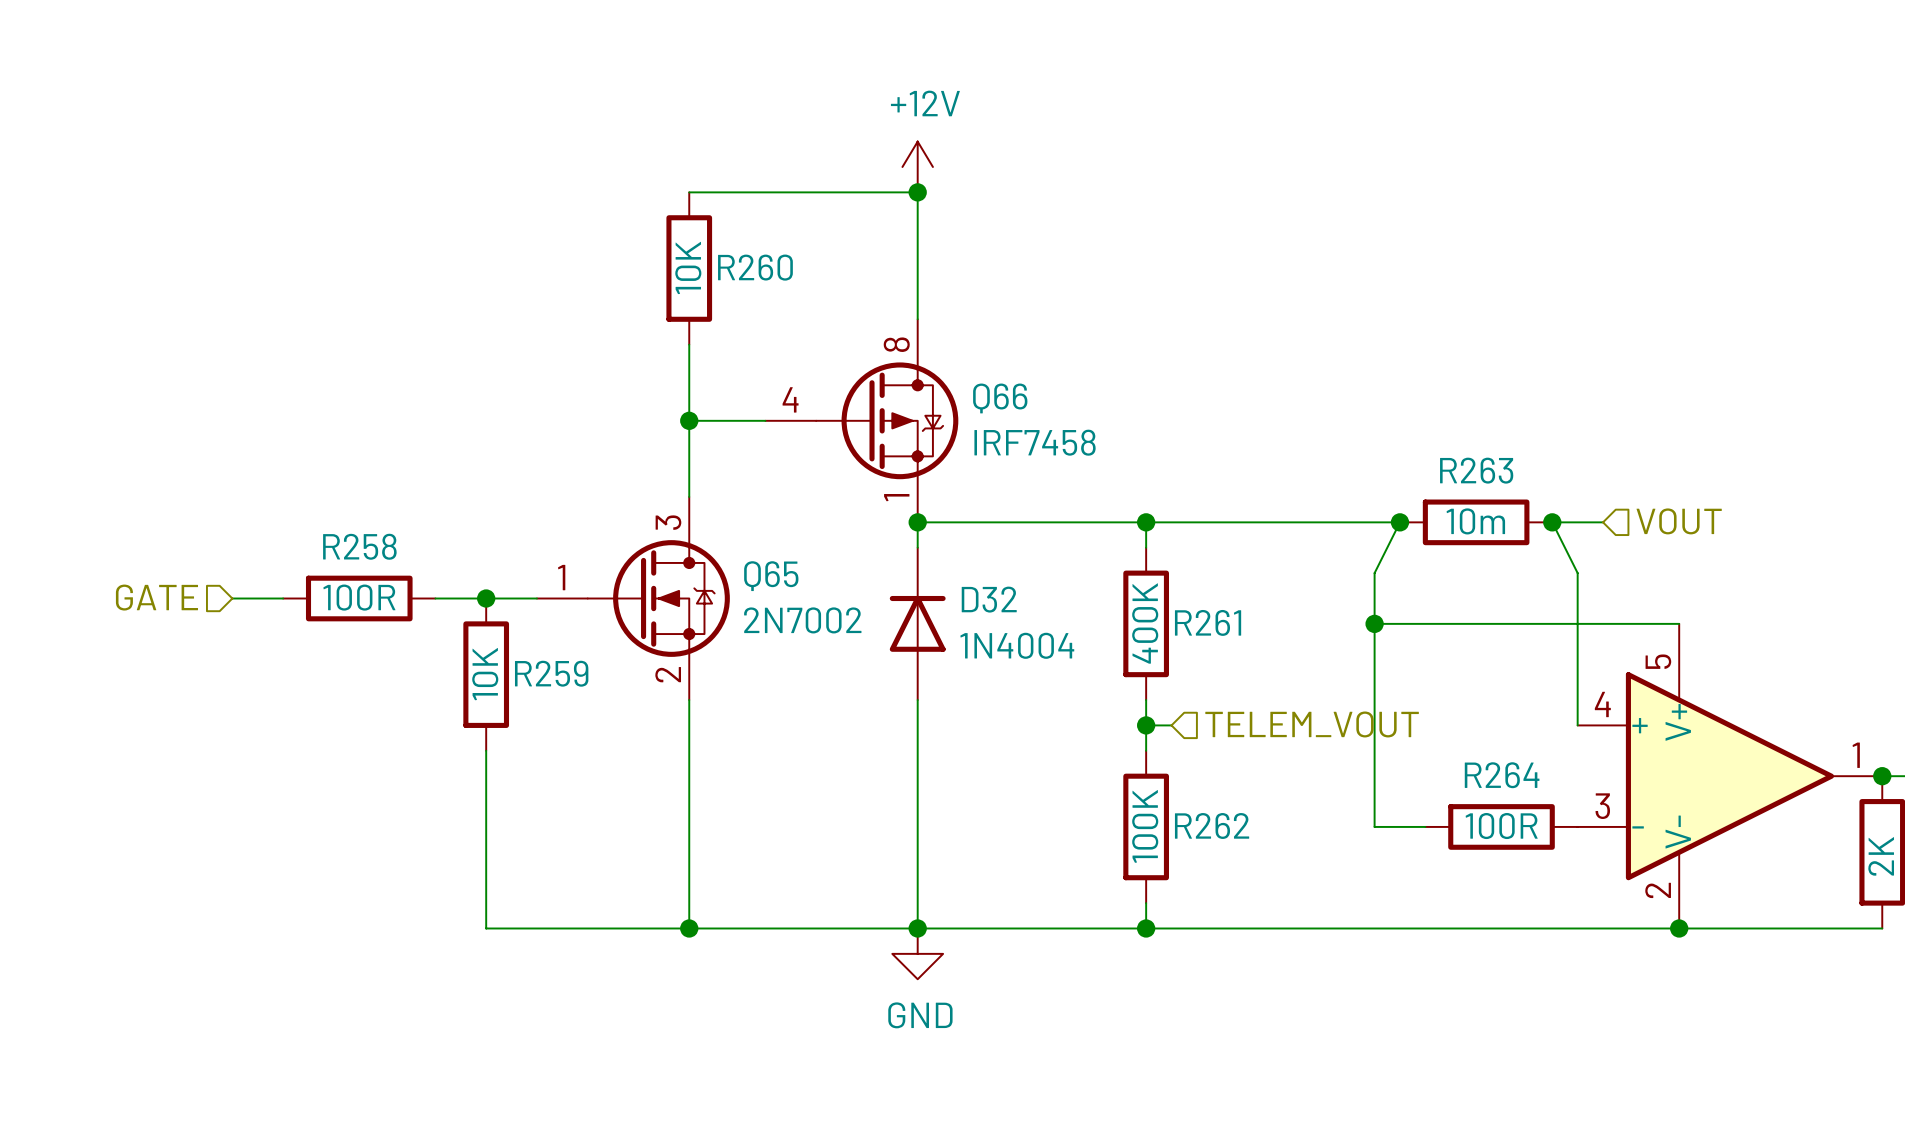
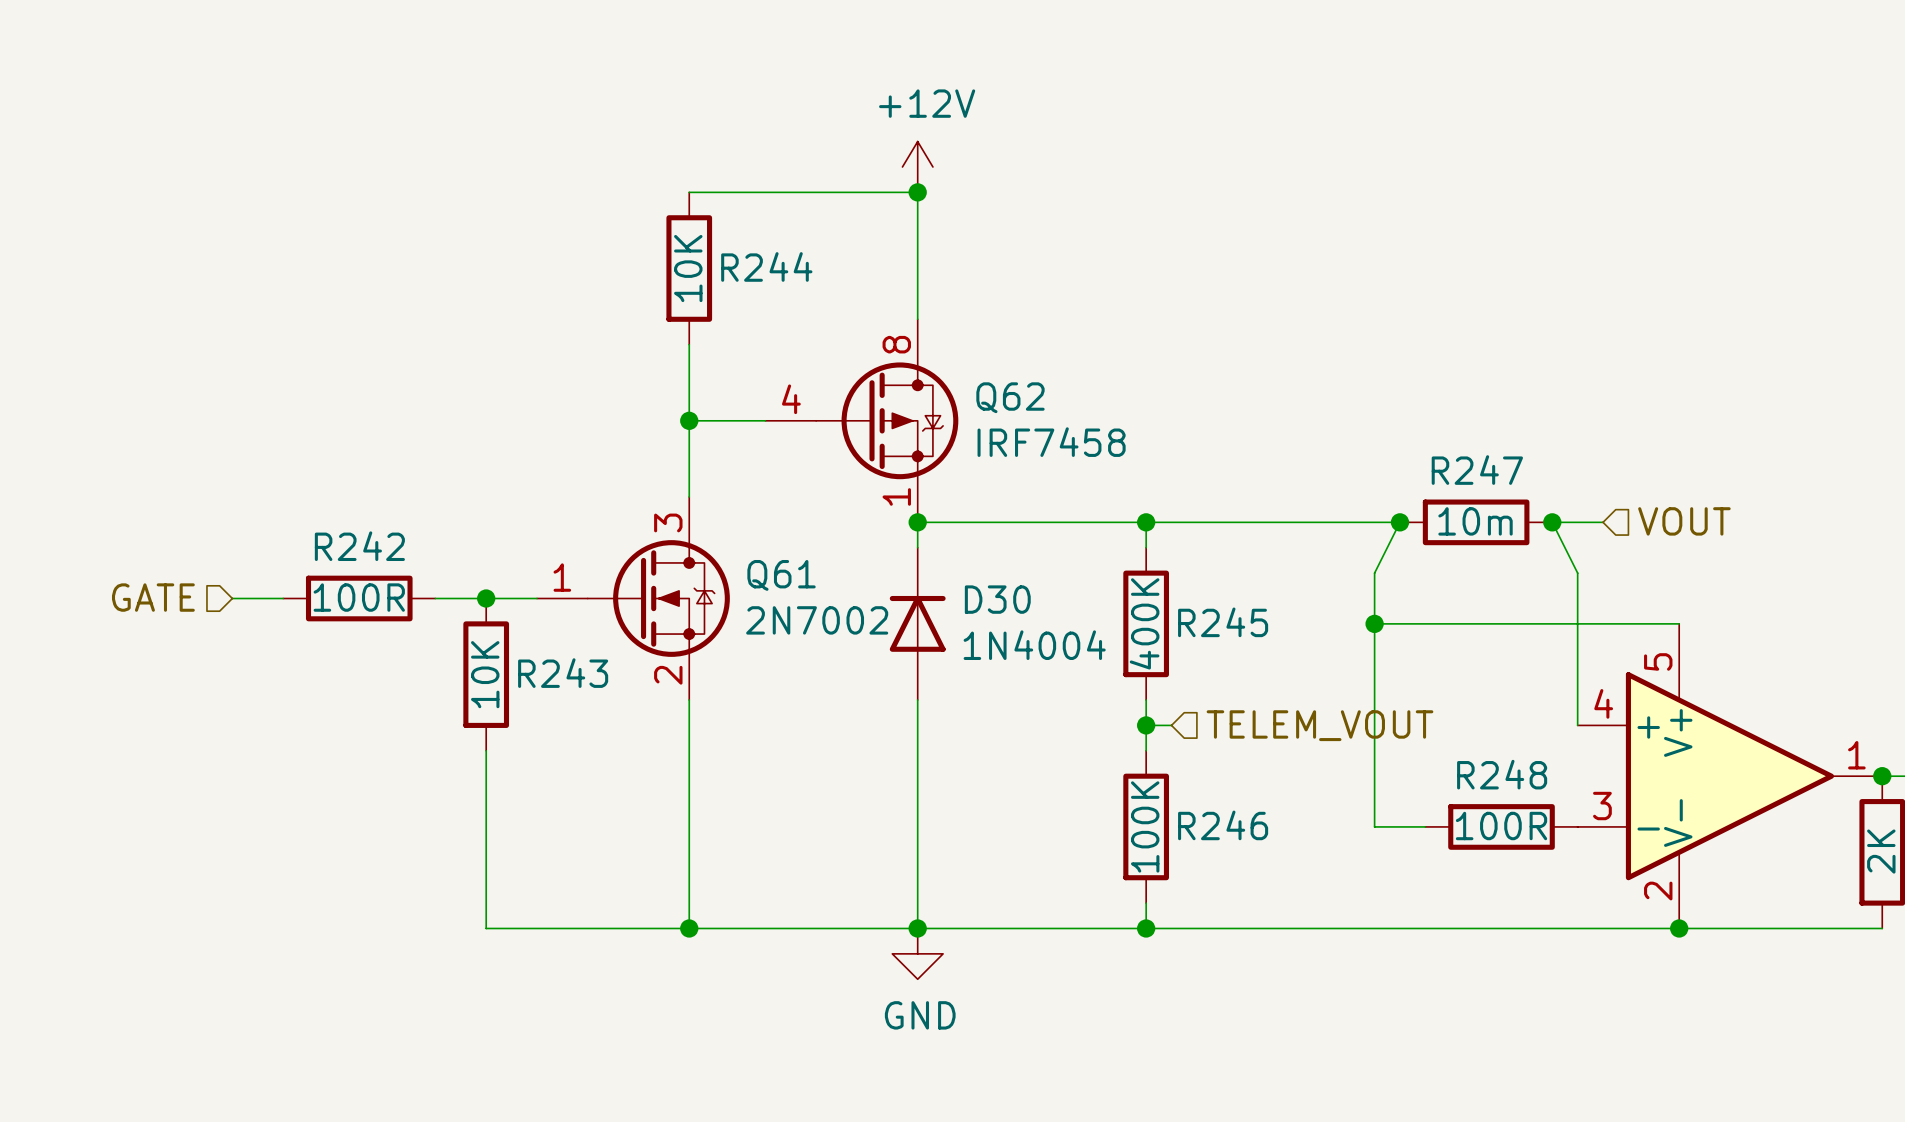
R260 name: R260 (755, 267) -> R244 (766, 266)
Q66 name: Q66 (1000, 398) -> Q62 (1010, 397)
R263 name: R263 (1476, 470) -> R247 (1477, 470)
R258 name: R258 (359, 546) -> R242 (359, 546)
Q65 name: Q65 (771, 576) -> Q61 (781, 575)
D32 name: D32 (989, 599) -> D30 (997, 599)
R261 name: R261 (1208, 622) -> R245 (1223, 622)
R259 name: R259 (551, 673) -> R243 (563, 673)
R264 name: R264 (1502, 775) -> R248 (1502, 774)
R262 name: R262 (1212, 825) -> R246 (1223, 825)

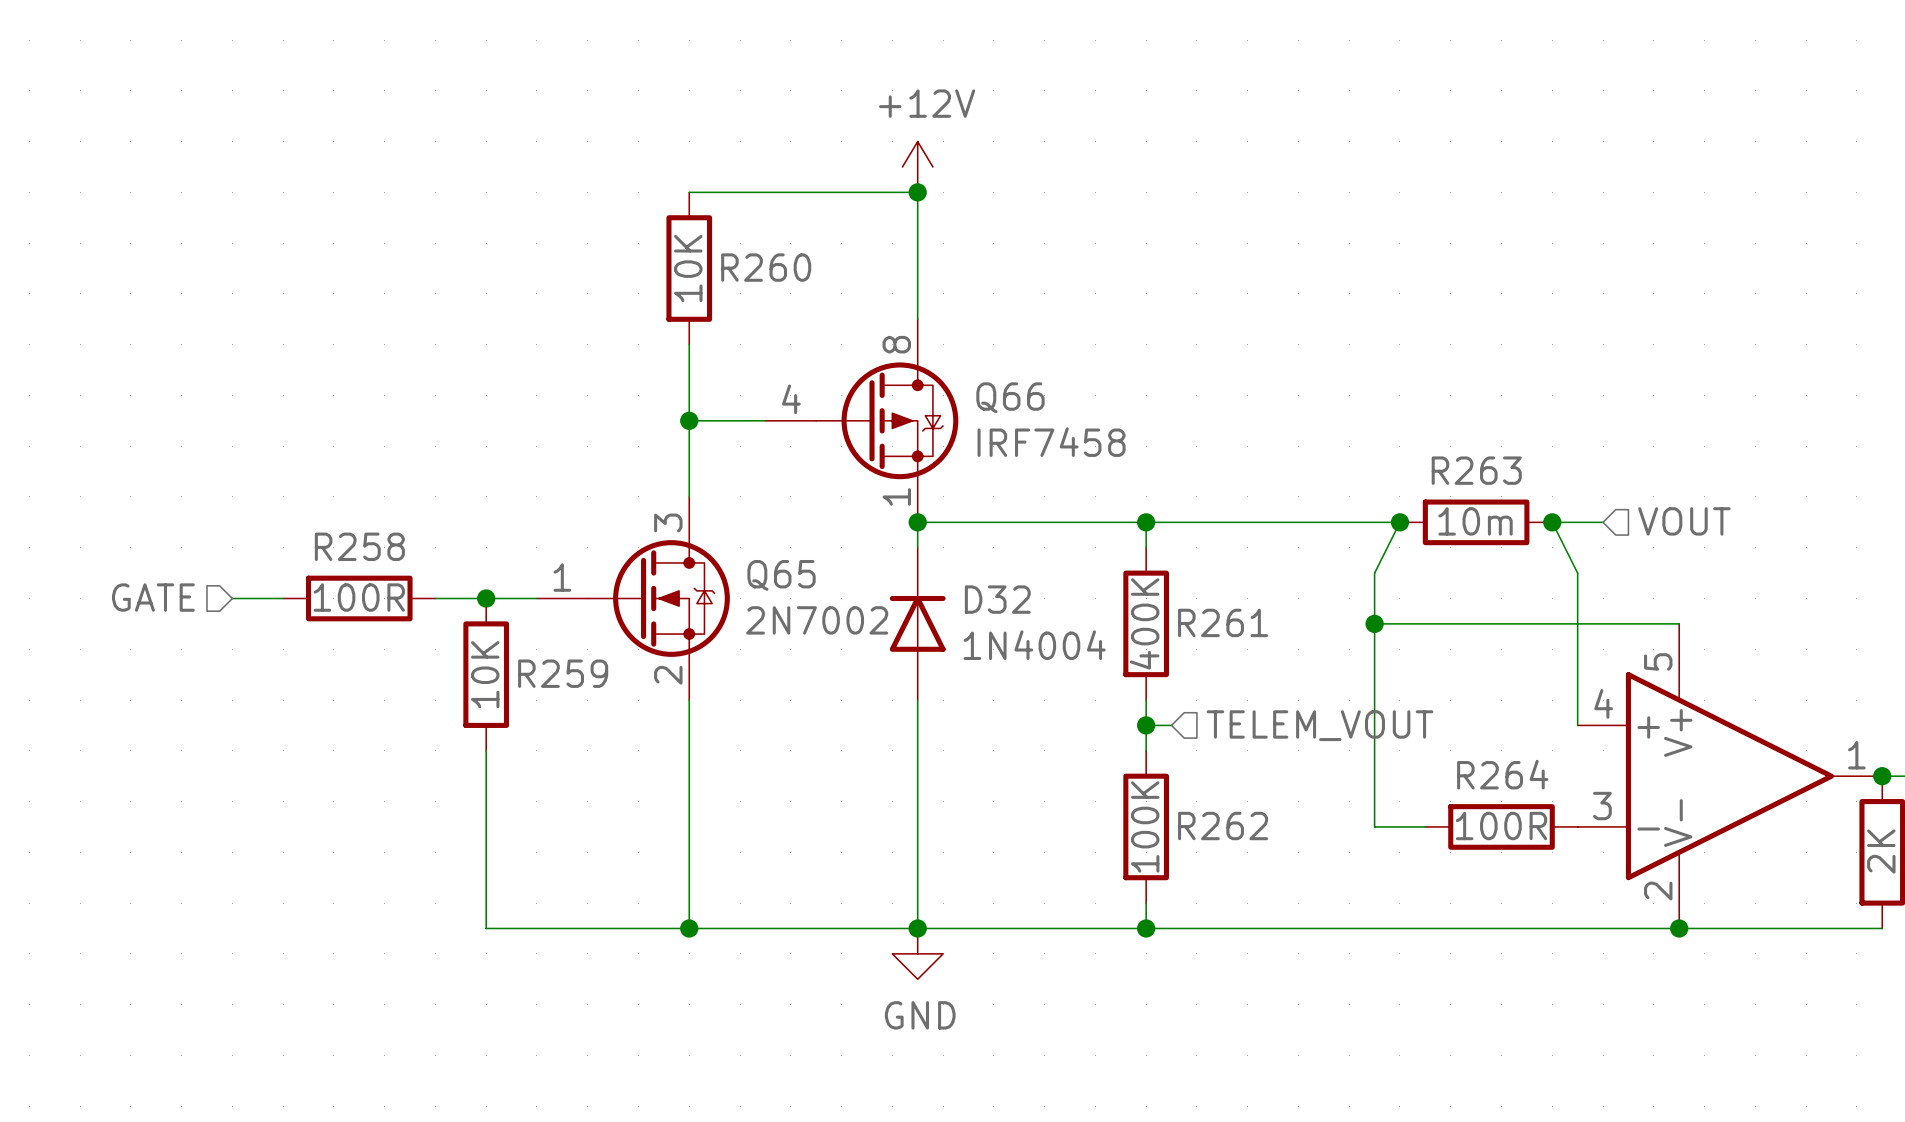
R244 name: R244 (766, 266) -> R260 (766, 267)
Q62 name: Q62 (1010, 397) -> Q66 (1010, 397)
R247 name: R247 (1477, 470) -> R263 (1476, 470)
R242 name: R242 (359, 546) -> R258 (359, 546)
Q61 name: Q61 (781, 575) -> Q65 (781, 575)
D30 name: D30 (997, 599) -> D32 (997, 599)
R245 name: R245 (1223, 622) -> R261 (1223, 622)
R243 name: R243 (563, 673) -> R259 (563, 673)
R248 name: R248 (1502, 774) -> R264 (1502, 774)
R246 name: R246 (1223, 825) -> R262 (1223, 826)

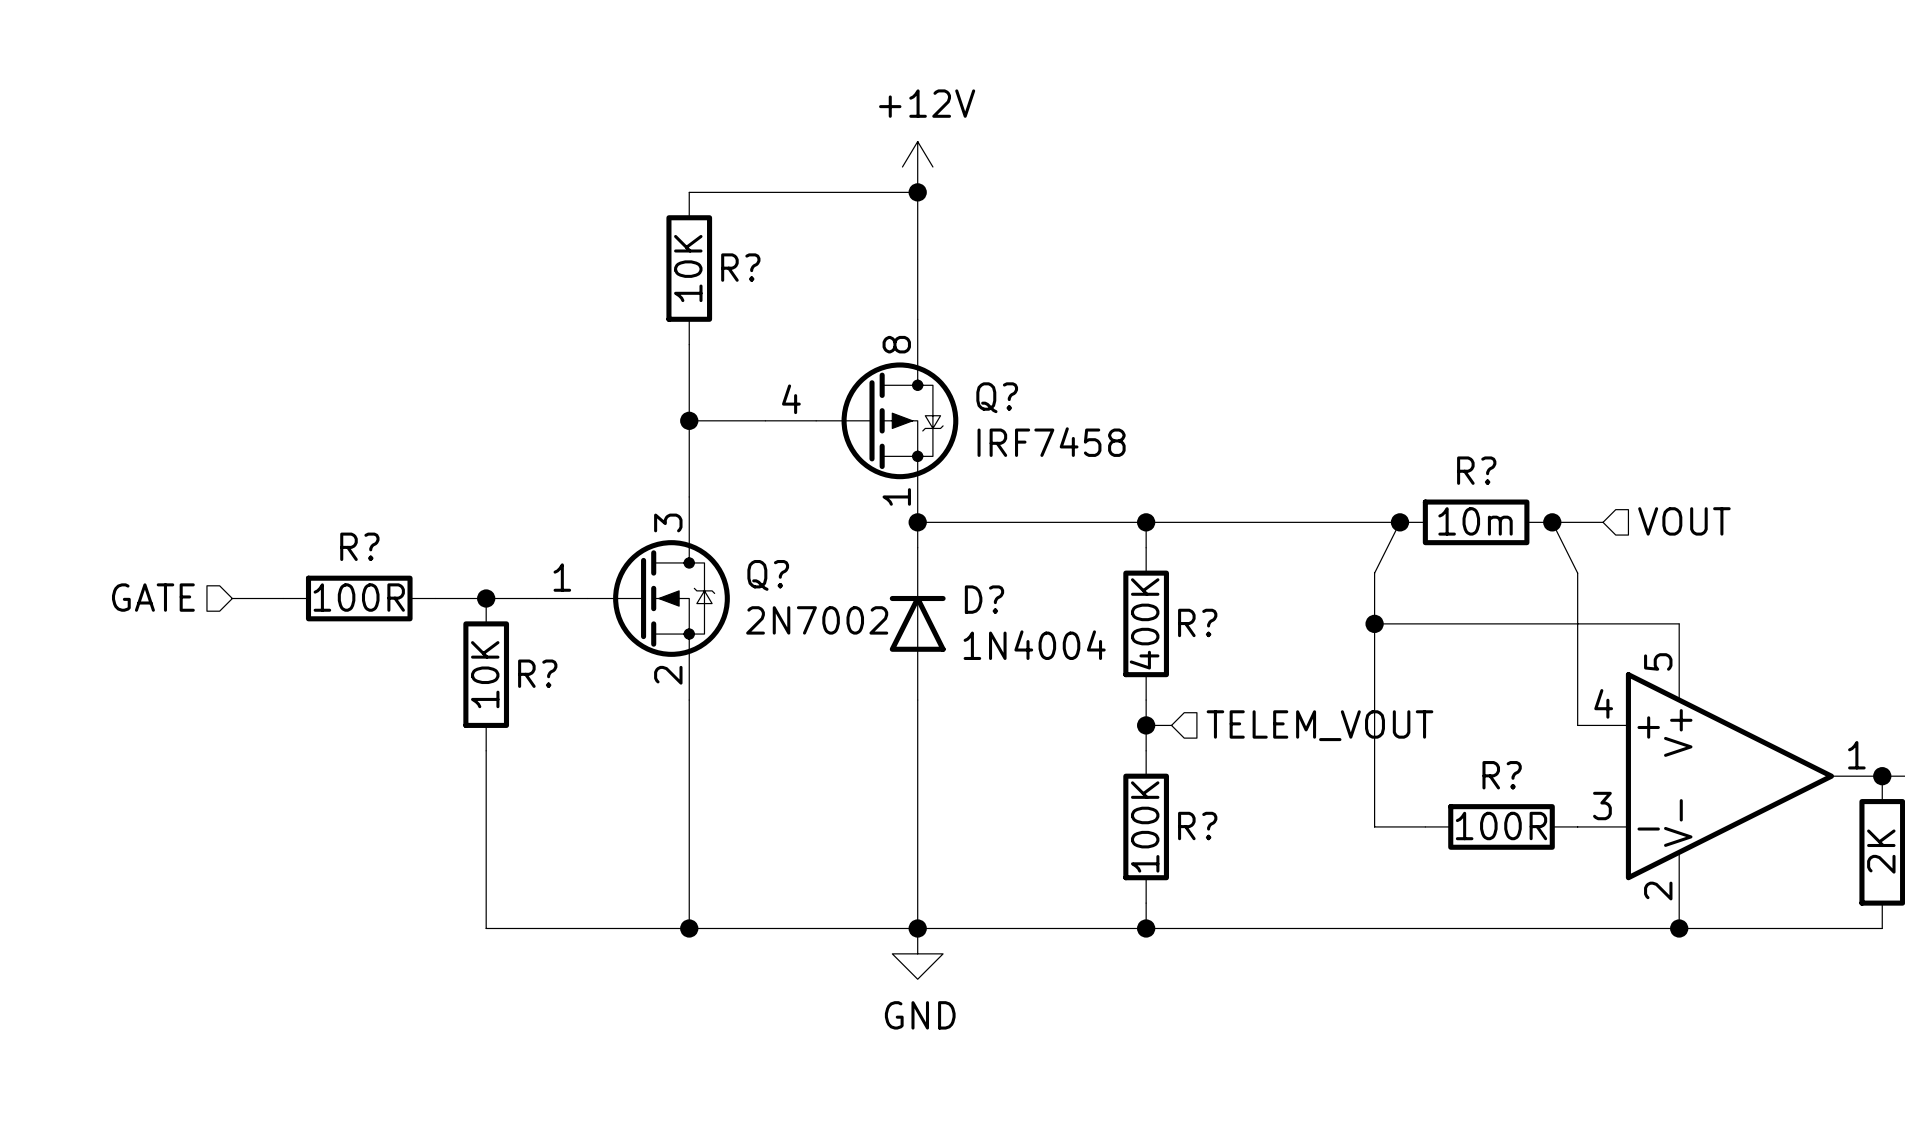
R260 name: R260 (766, 267) -> R? (740, 267)
Q66 name: Q66 (1010, 397) -> Q? (997, 397)
R263 name: R263 (1476, 470) -> R? (1476, 470)
R258 name: R258 (359, 546) -> R? (359, 546)
Q65 name: Q65 (781, 575) -> Q? (768, 575)
D32 name: D32 (997, 599) -> D? (984, 599)
R261 name: R261 (1223, 622) -> R? (1197, 622)
R259 name: R259 (563, 673) -> R? (537, 673)
R264 name: R264 (1502, 774) -> R? (1502, 775)
R262 name: R262 (1223, 826) -> R? (1197, 826)

